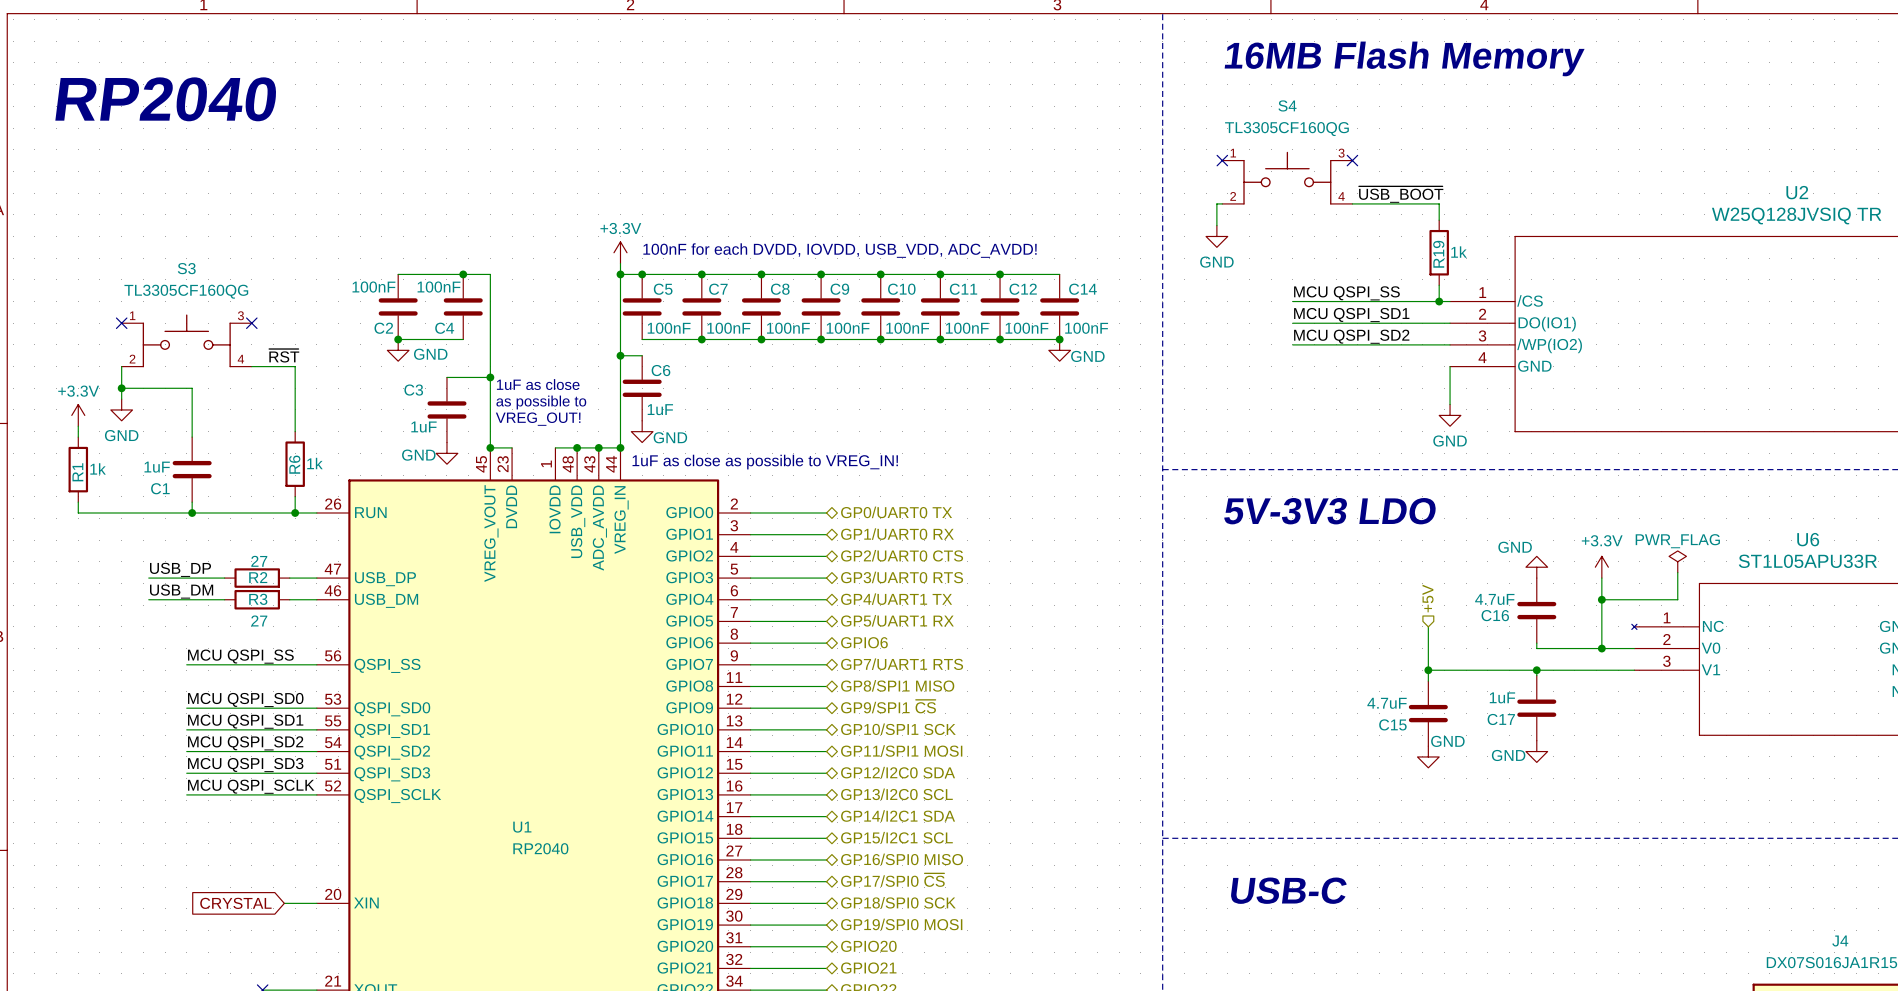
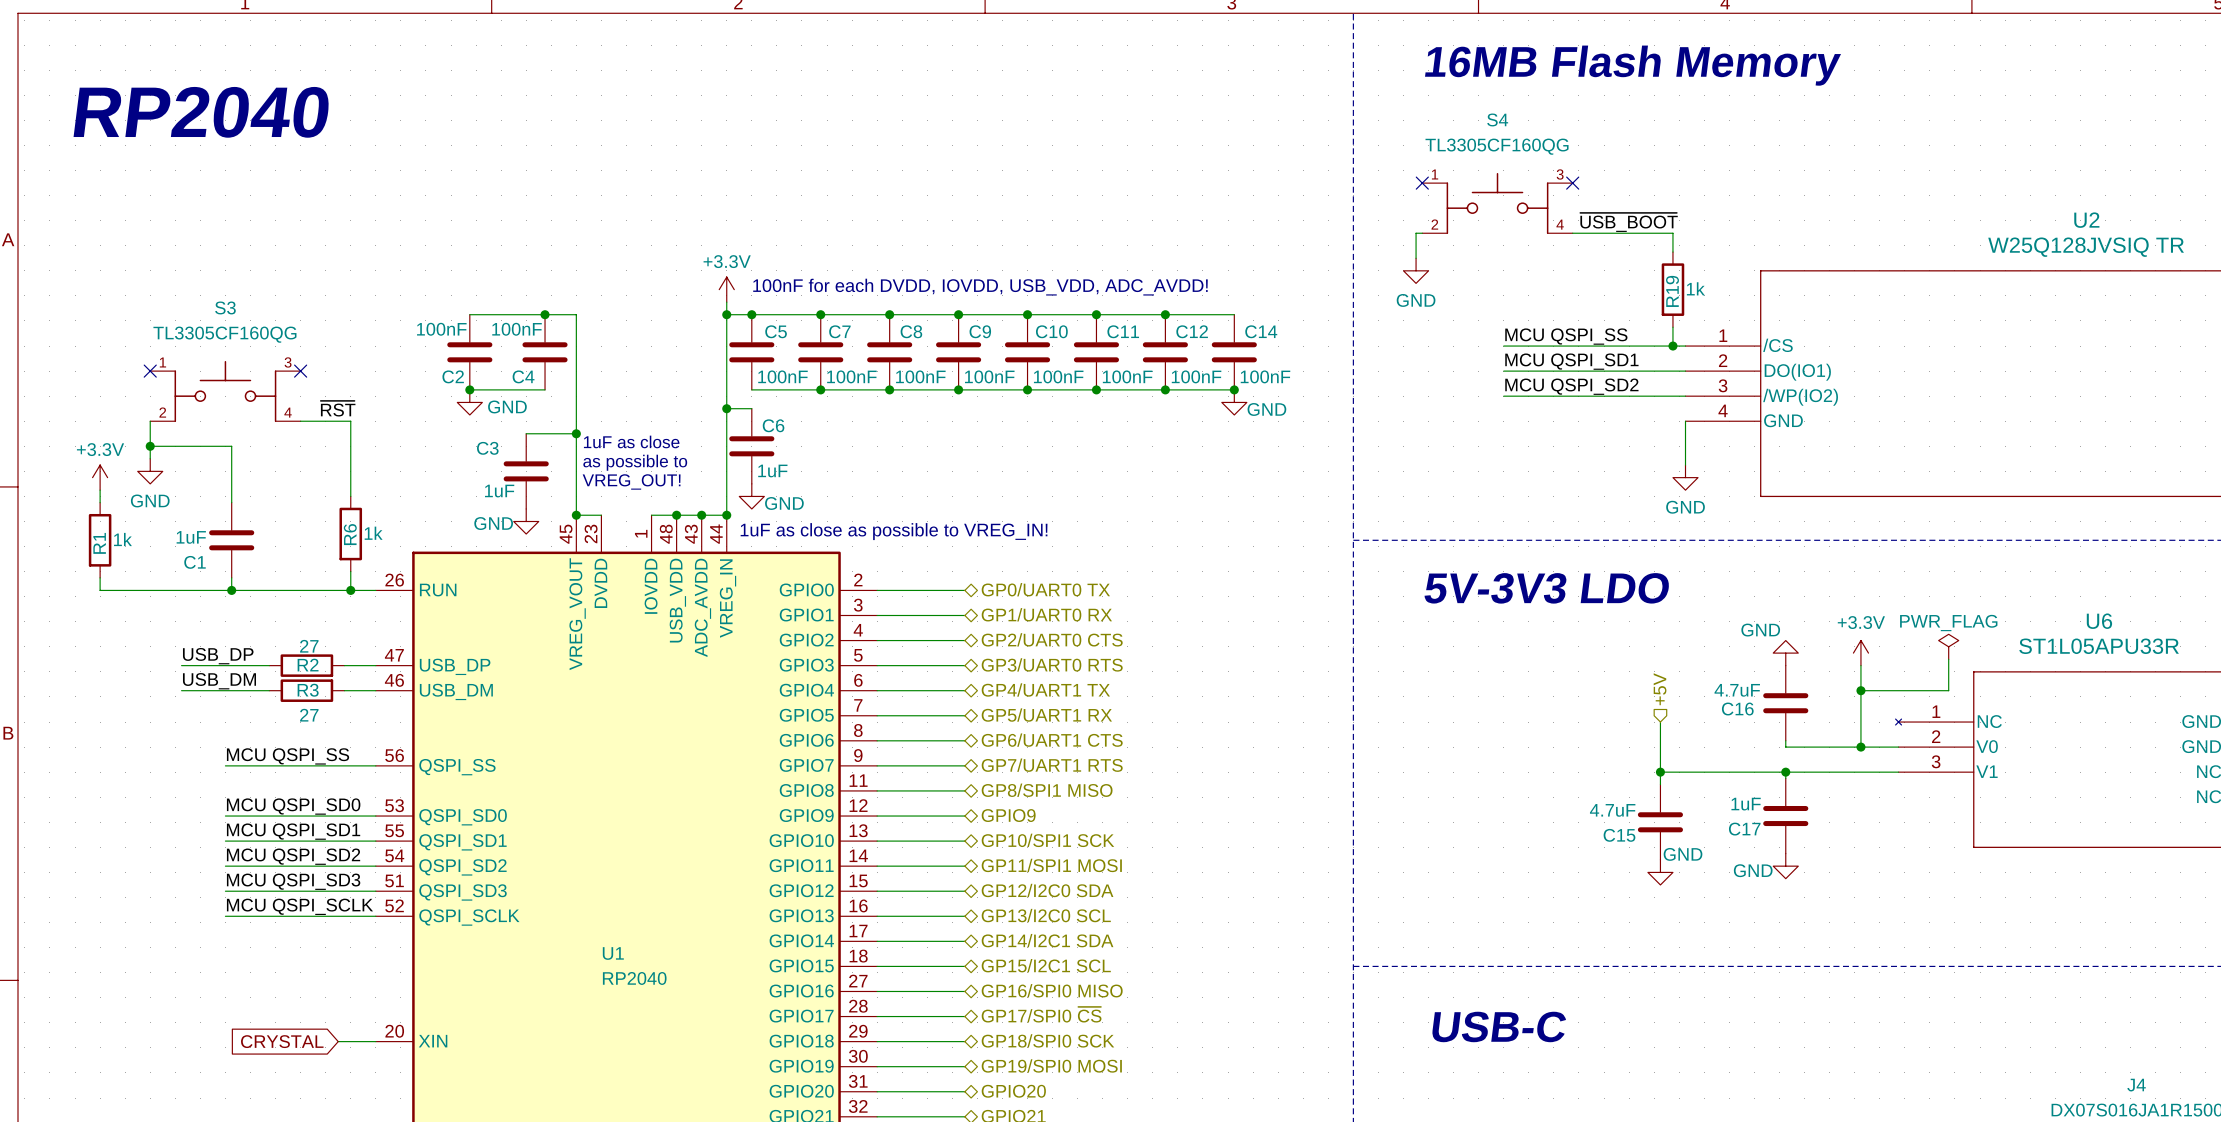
hierarchical label: GPIO6 (864, 642) -> GP6/UART1 CTS (1052, 740)
hierarchical label: GP9/SPI1 ~{CS} (888, 706) -> GPIO9 (1008, 815)

